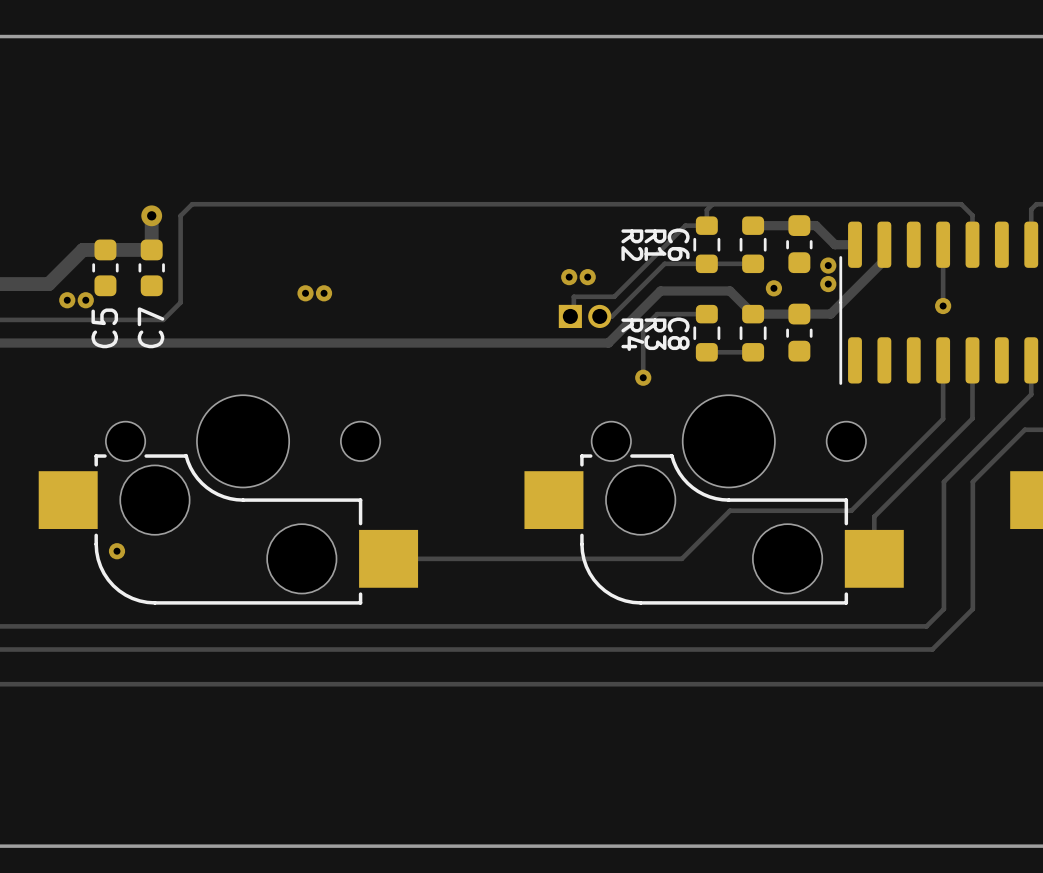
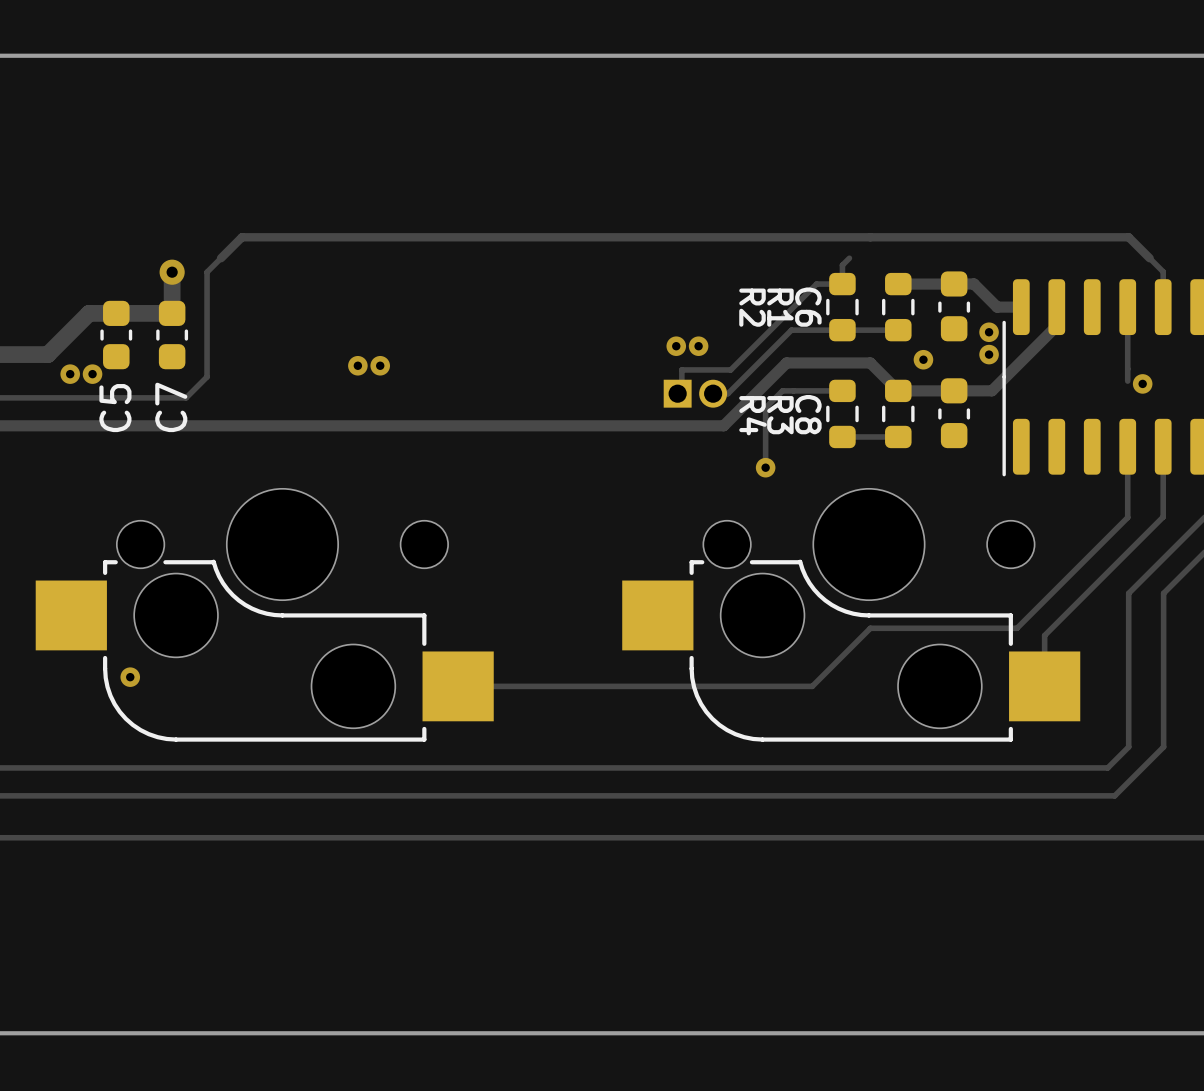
track: (192, 204) (961, 204) -> (221, 258) (241, 237) (1128, 237) (1149, 258)
via position: (943, 306) -> (1142, 383)

